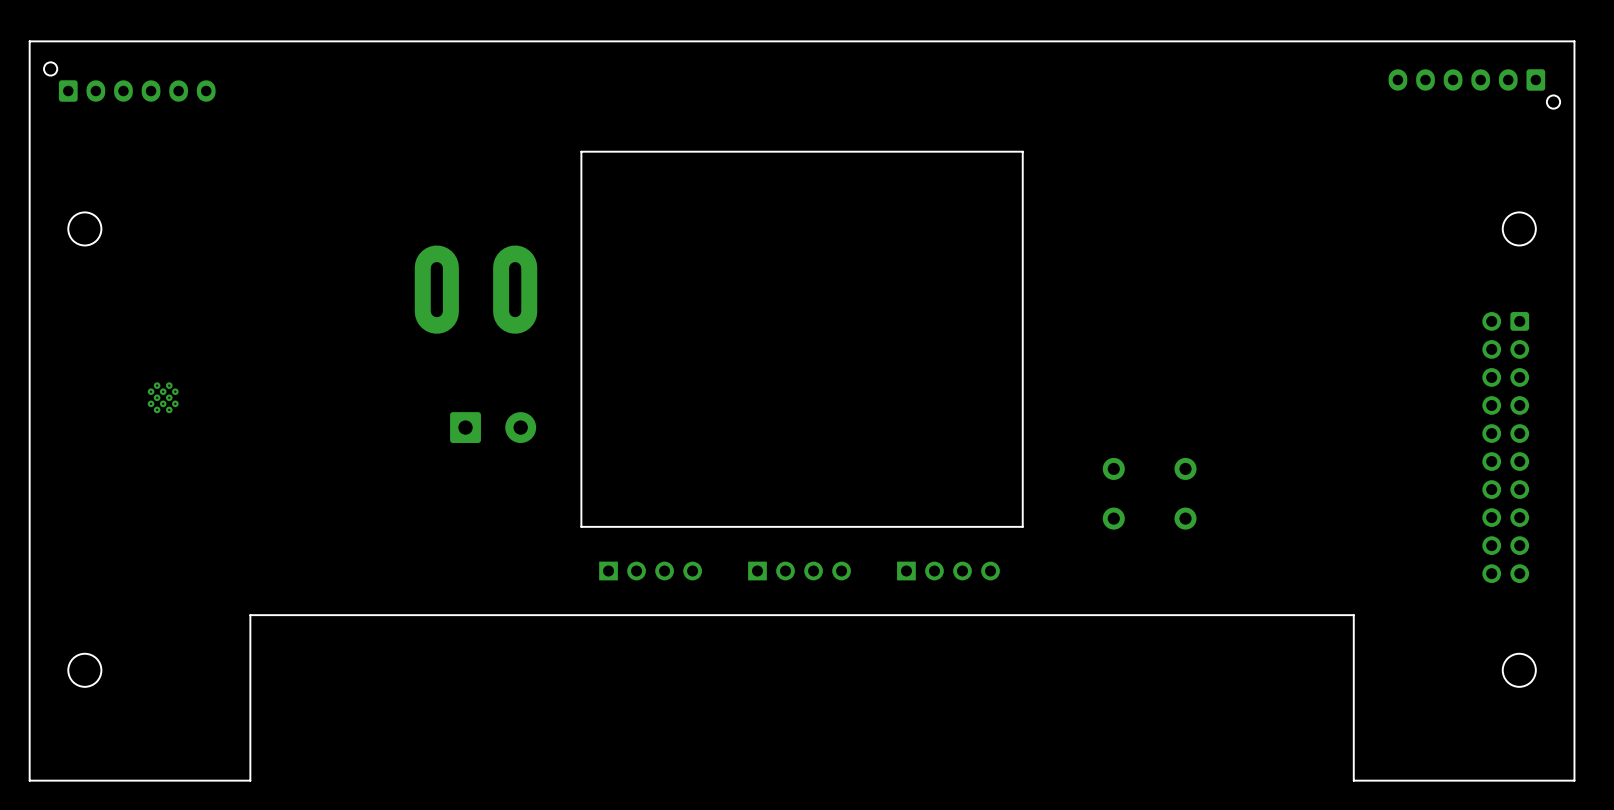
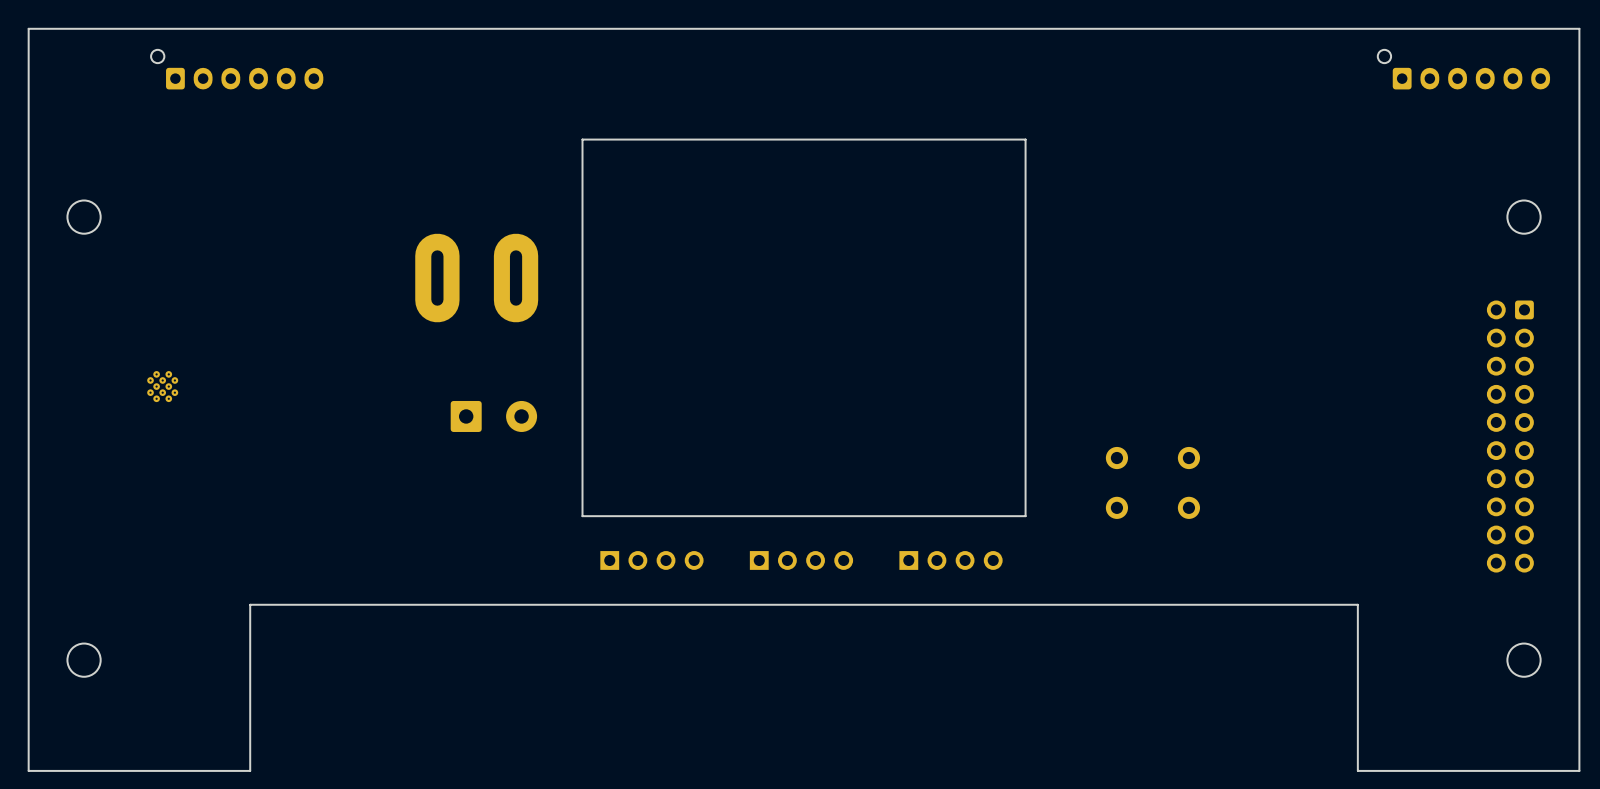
part position: (129, 82) -> (237, 69)
part rotation: 0° (1474, 88) -> 180° (1463, 69)

